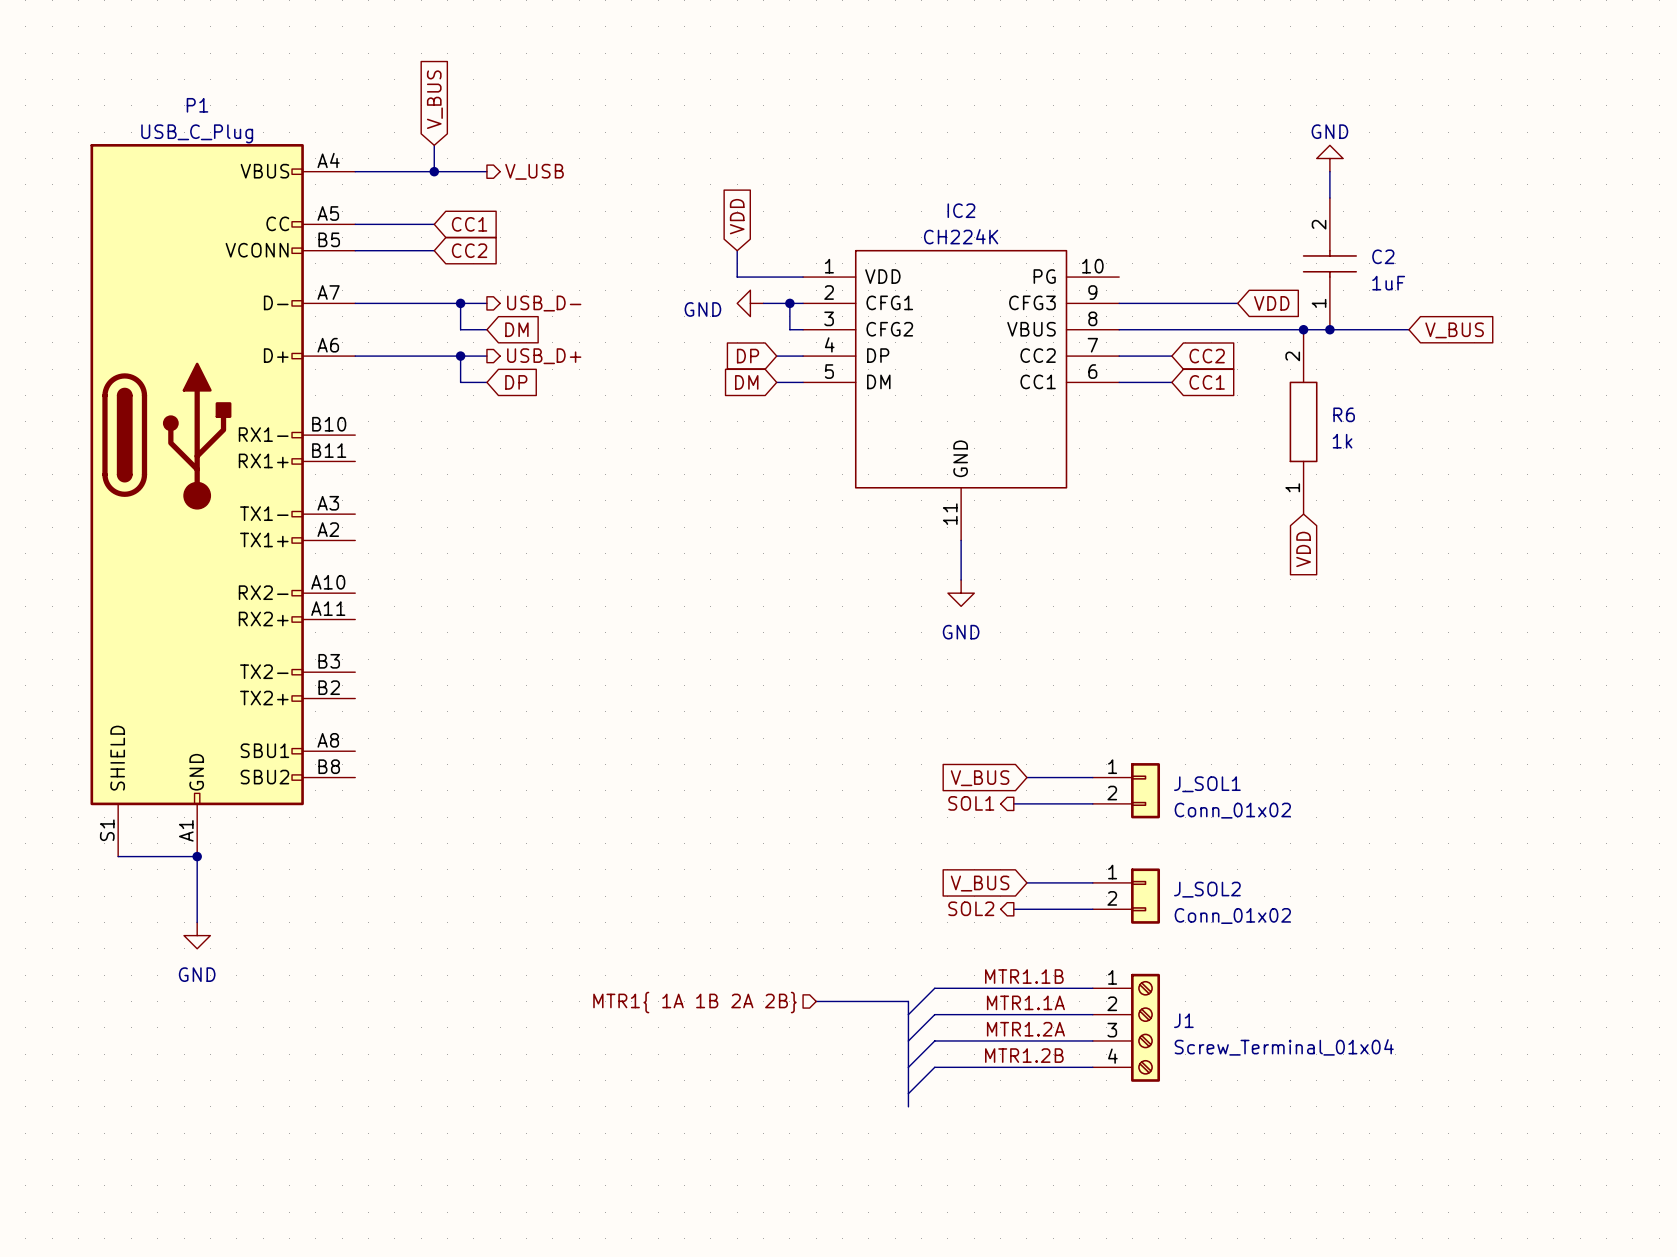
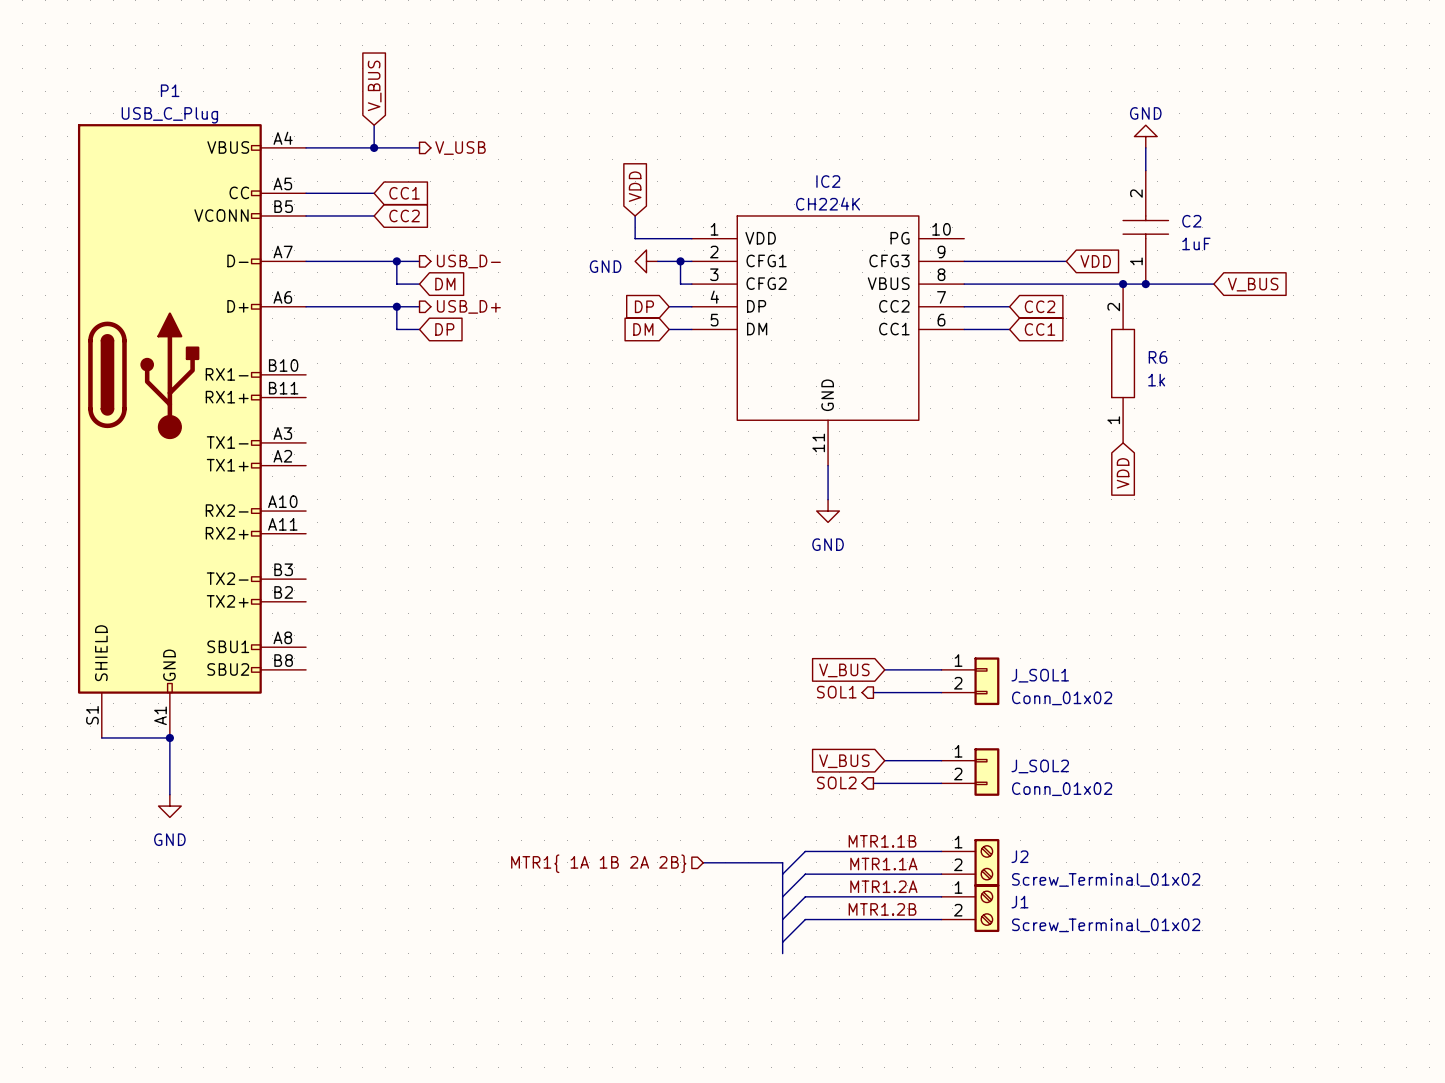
J1 symbol: [1092, 973, 1161, 1082] -> [941, 884, 1000, 933]
J2: none -> Screw_Terminal_01x02 (970, 862)
J1 value: Screw_Terminal_01x04 (1284, 1047) -> Screw_Terminal_01x02 (1106, 925)

